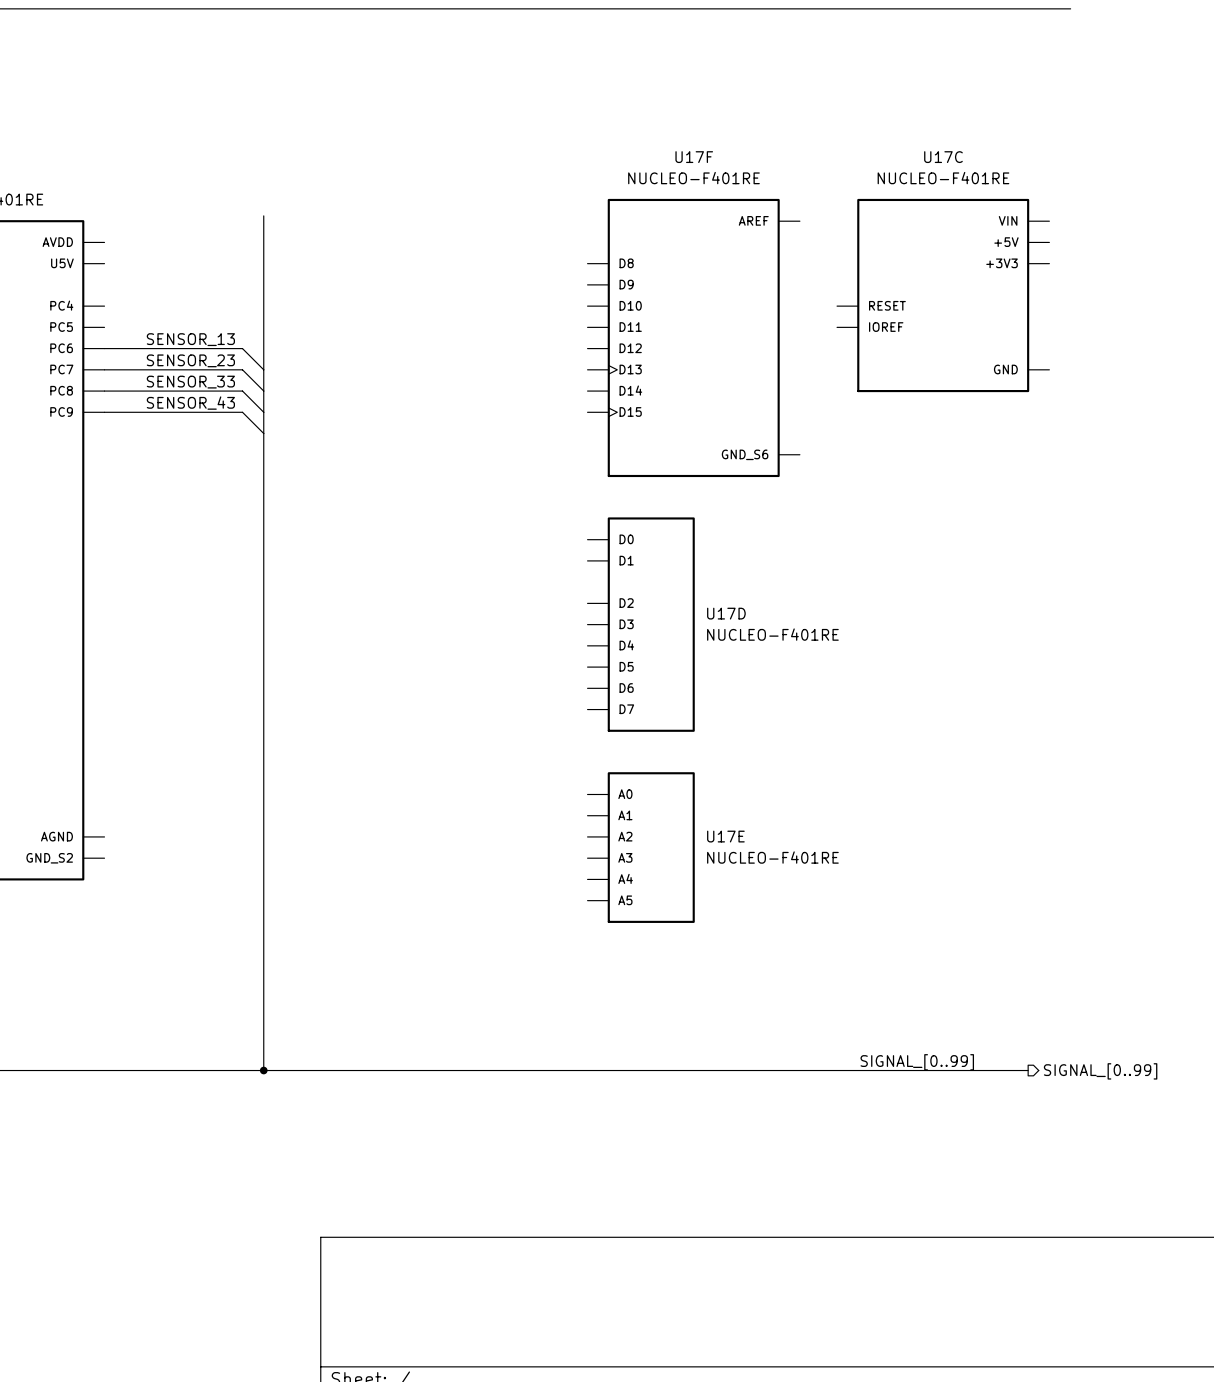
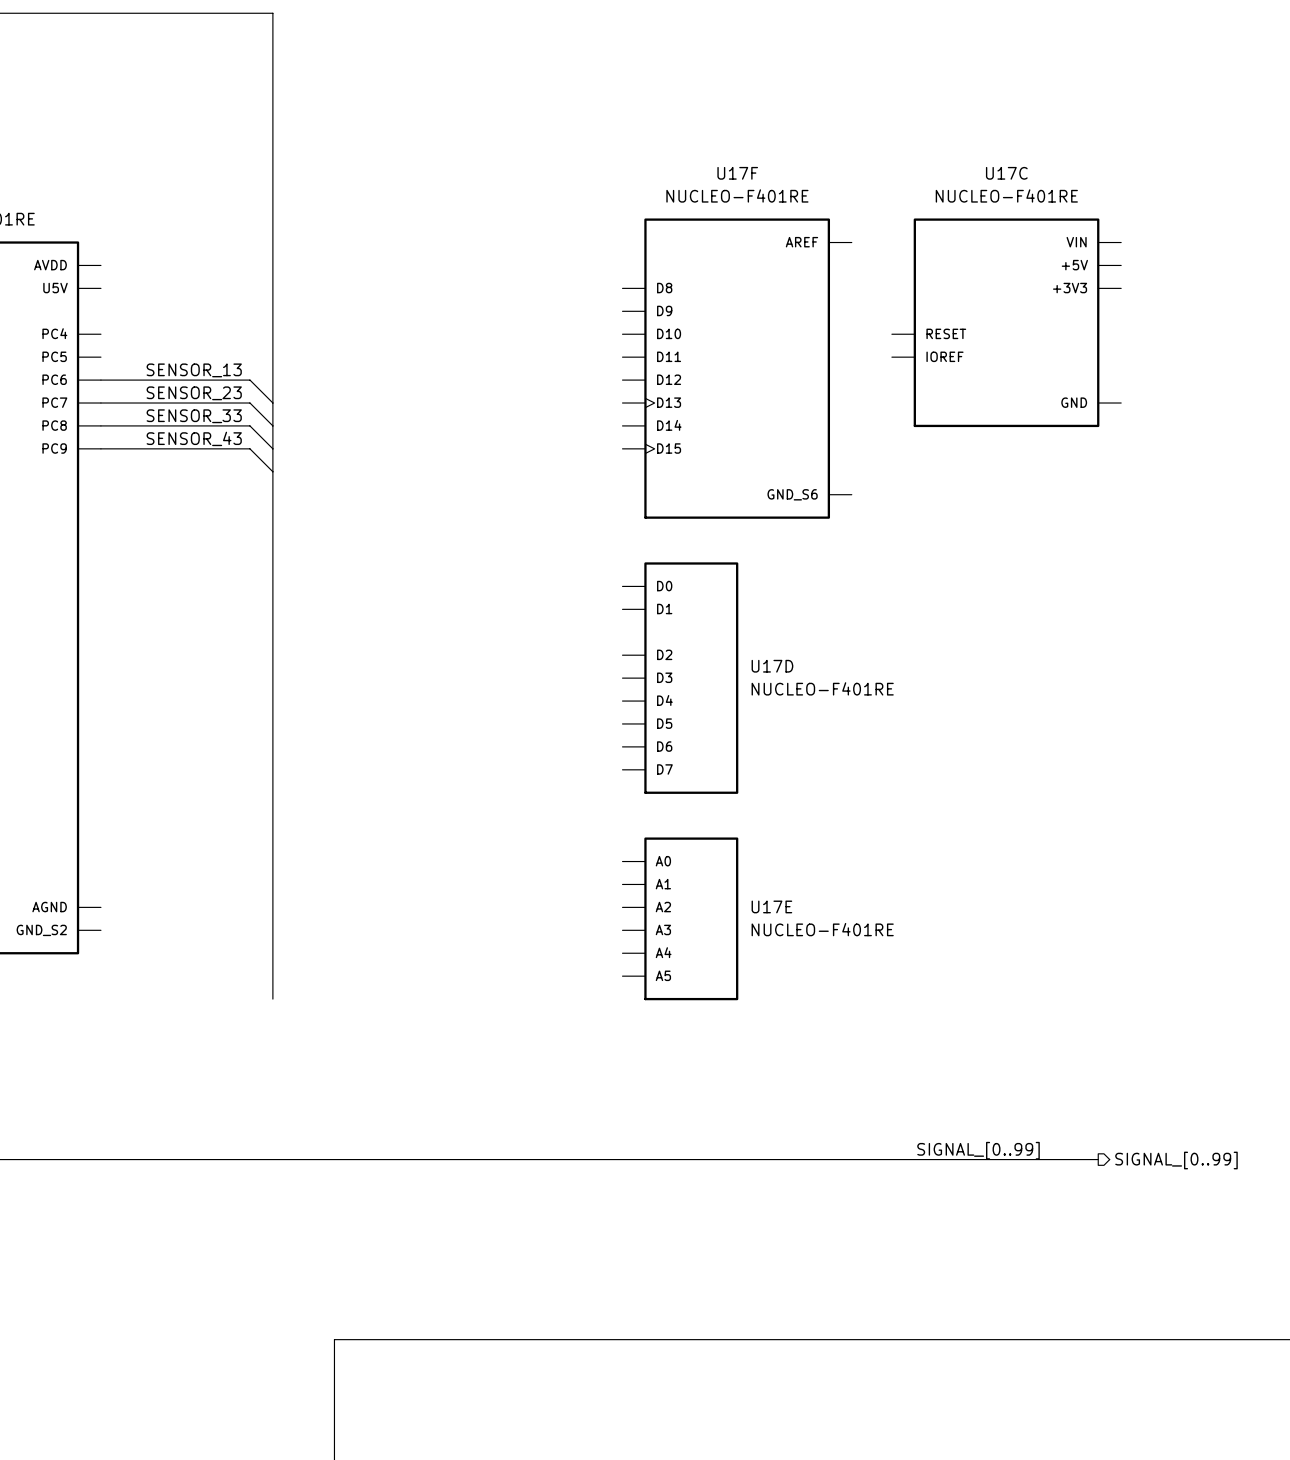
bus: (263, 8) (1070, 8) -> (272, 13) (272, 236)
bus: (263, 921) (263, 1070) -> none
junction: (263, 1070) -> none

